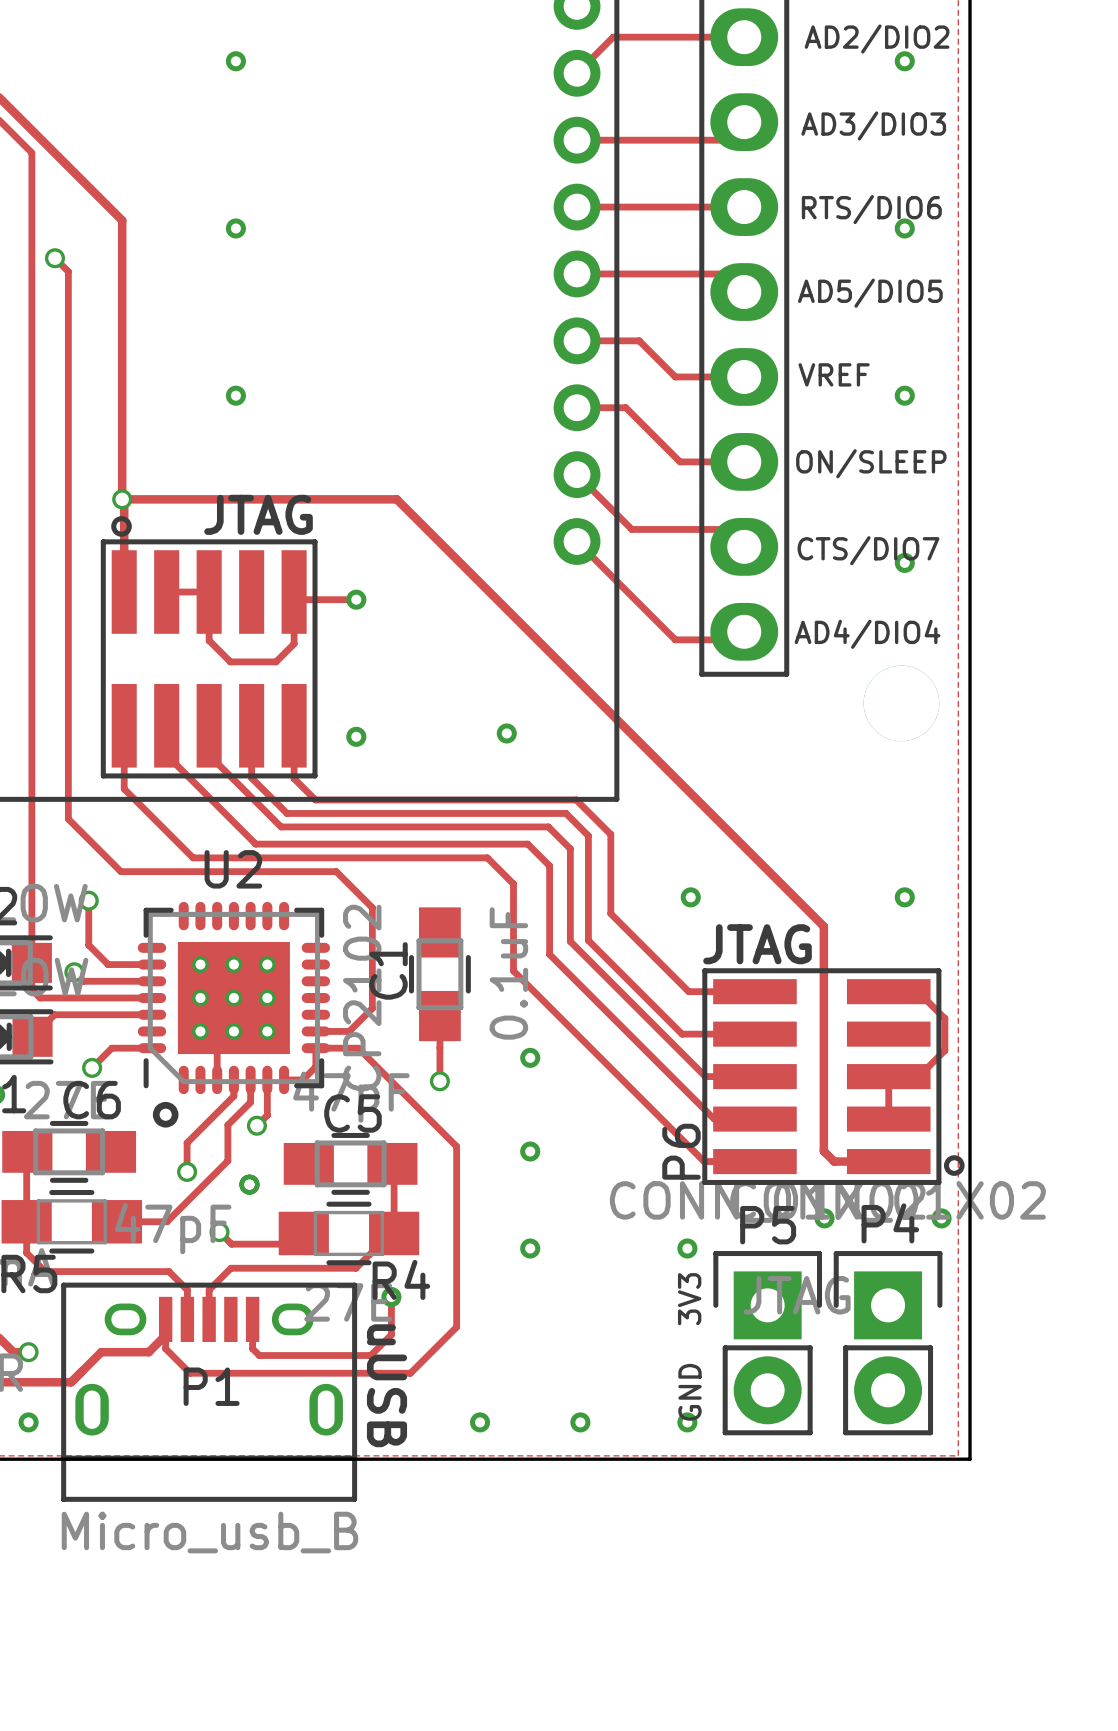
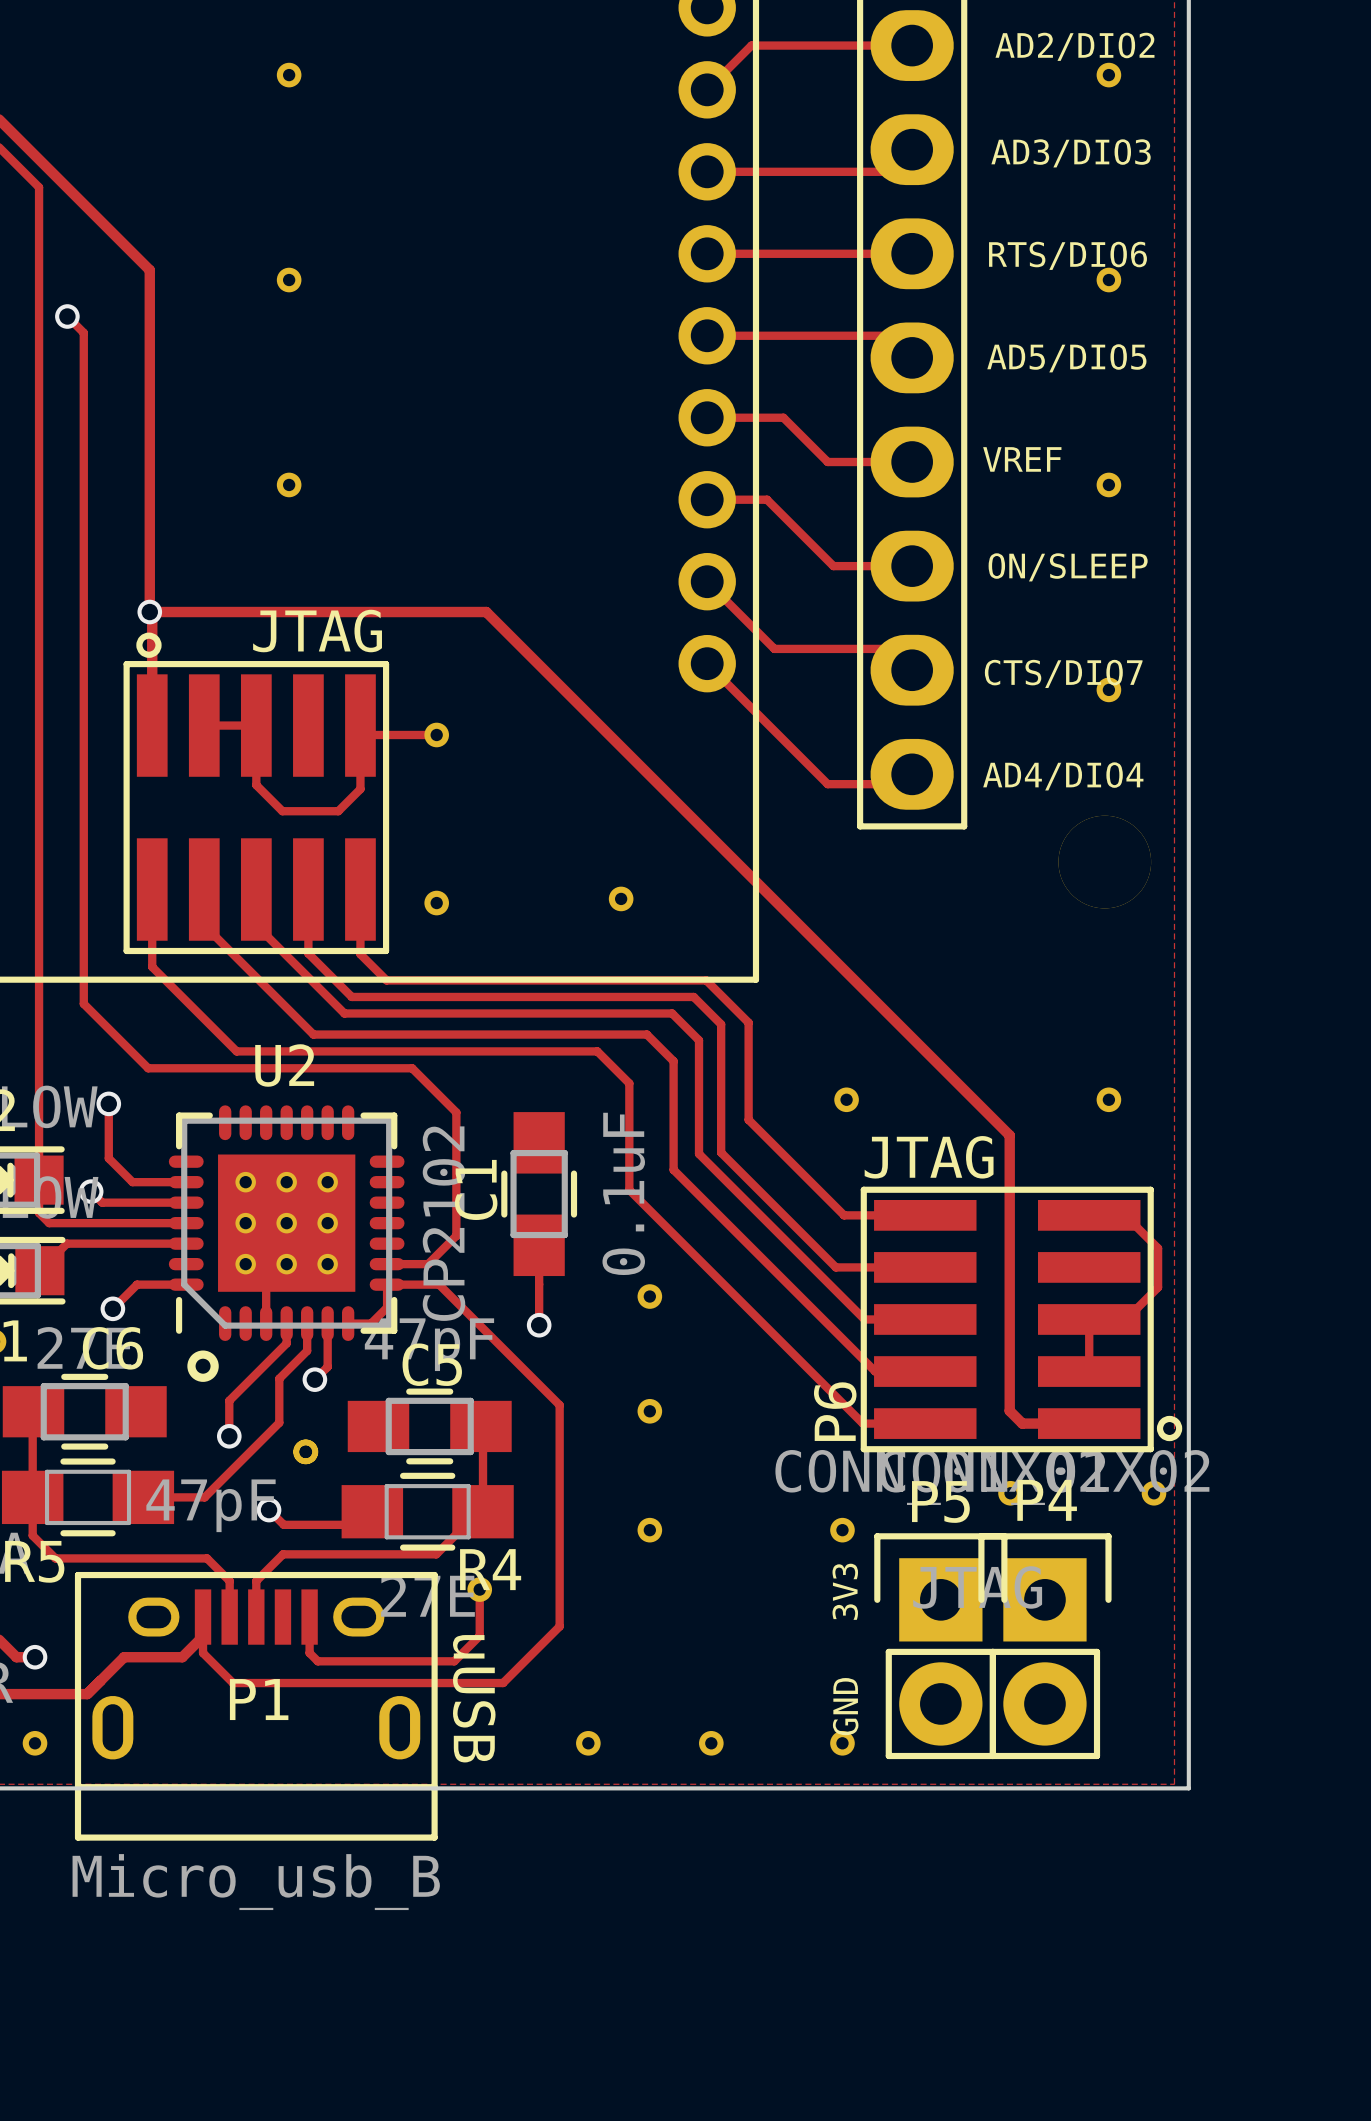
P4 position: (888, 1343) -> (1044, 1646)

